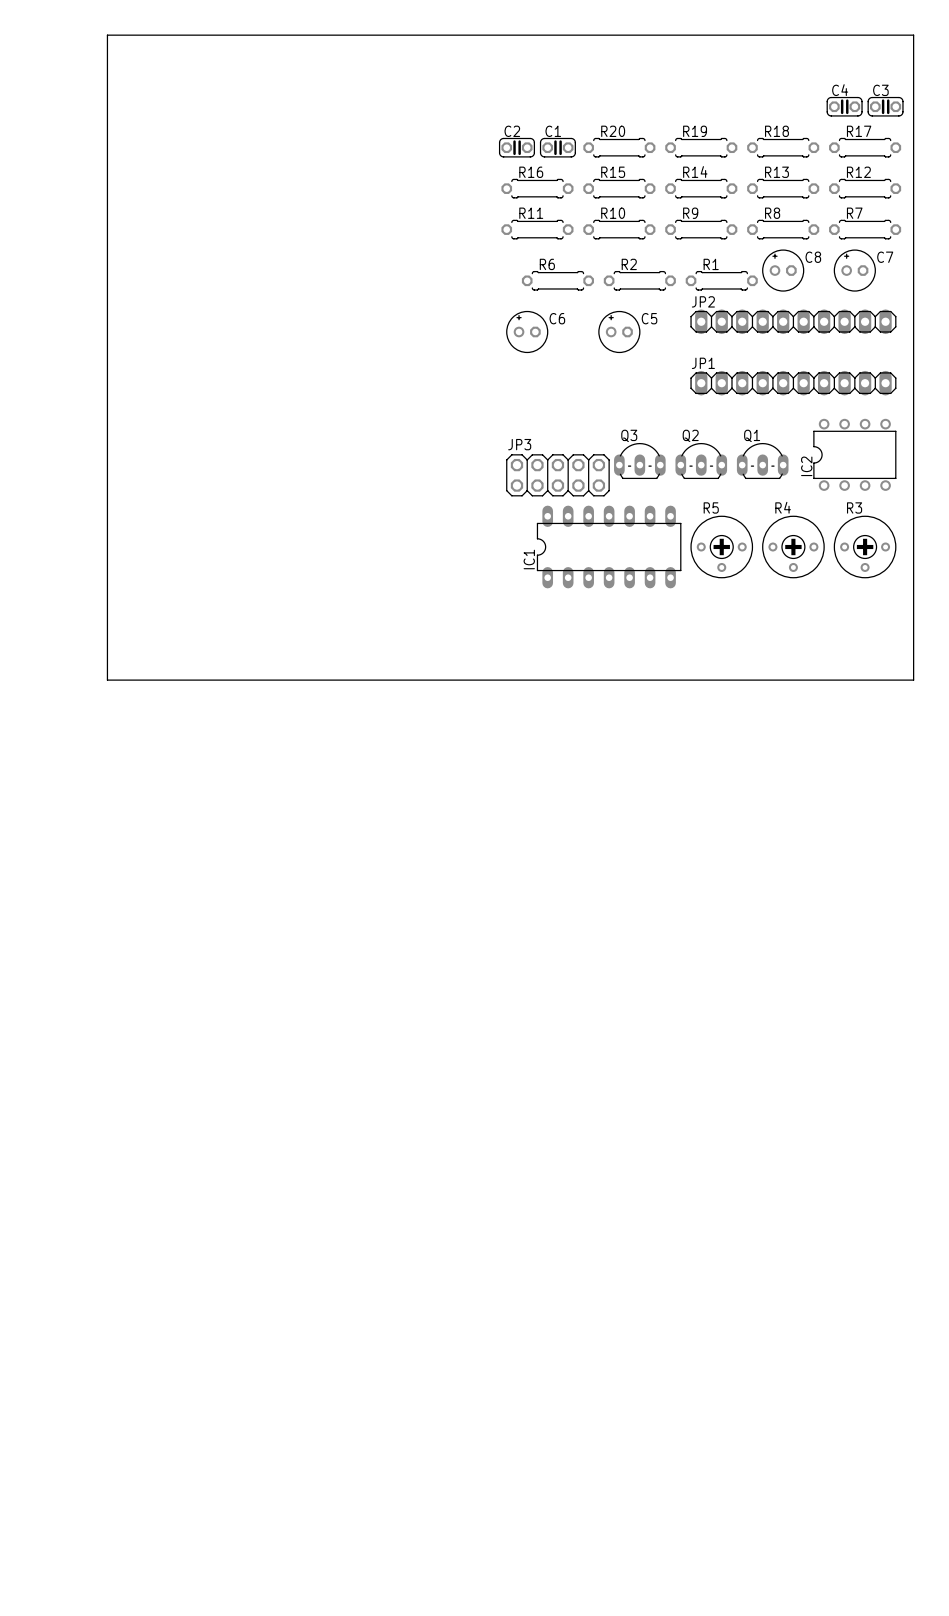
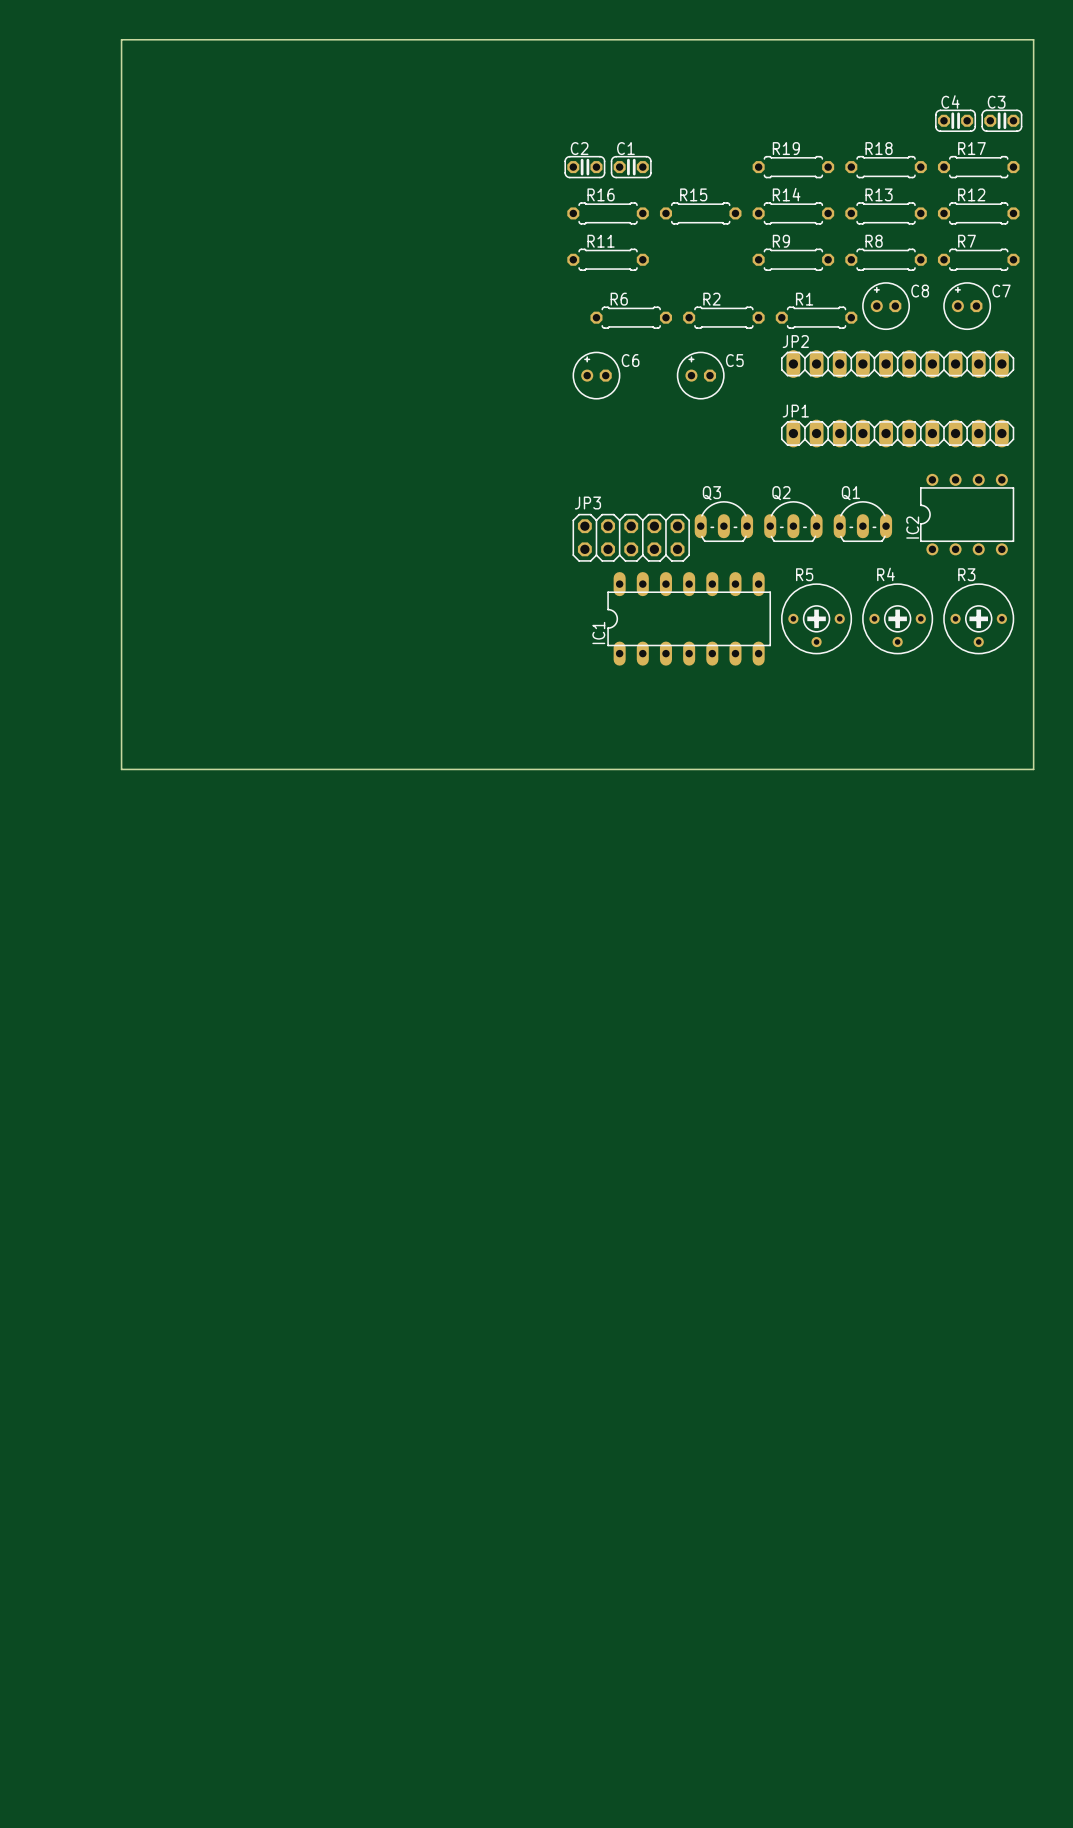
R20: (619, 147) -> none
R10: (619, 229) -> none

